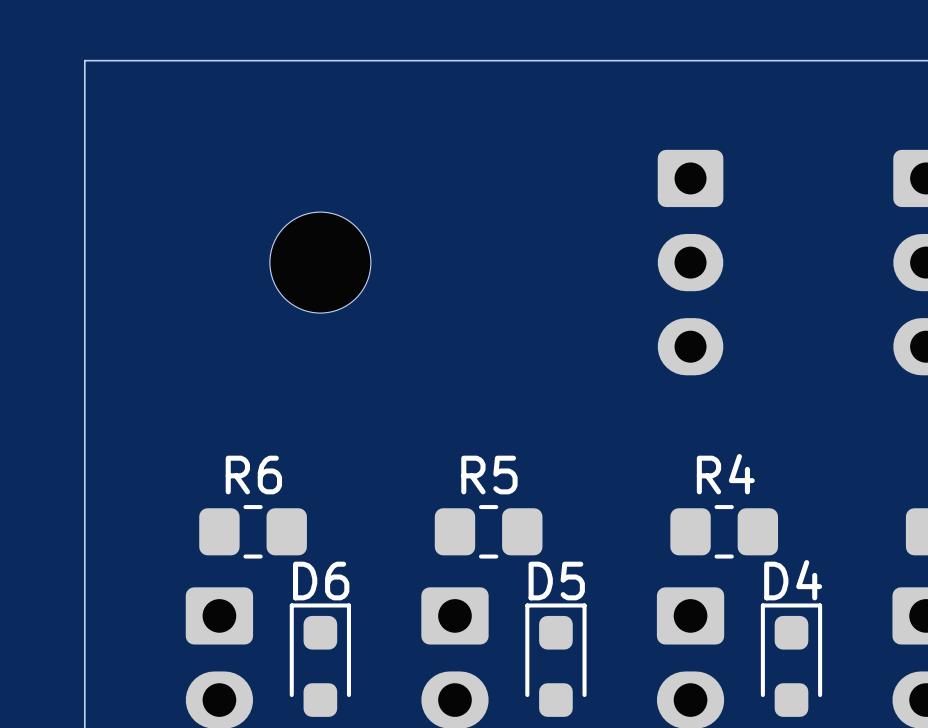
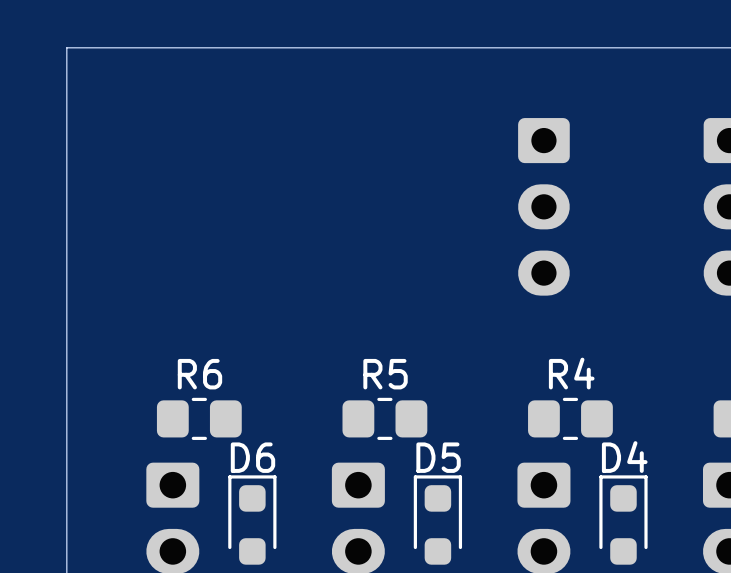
part: (320, 262) -> none

